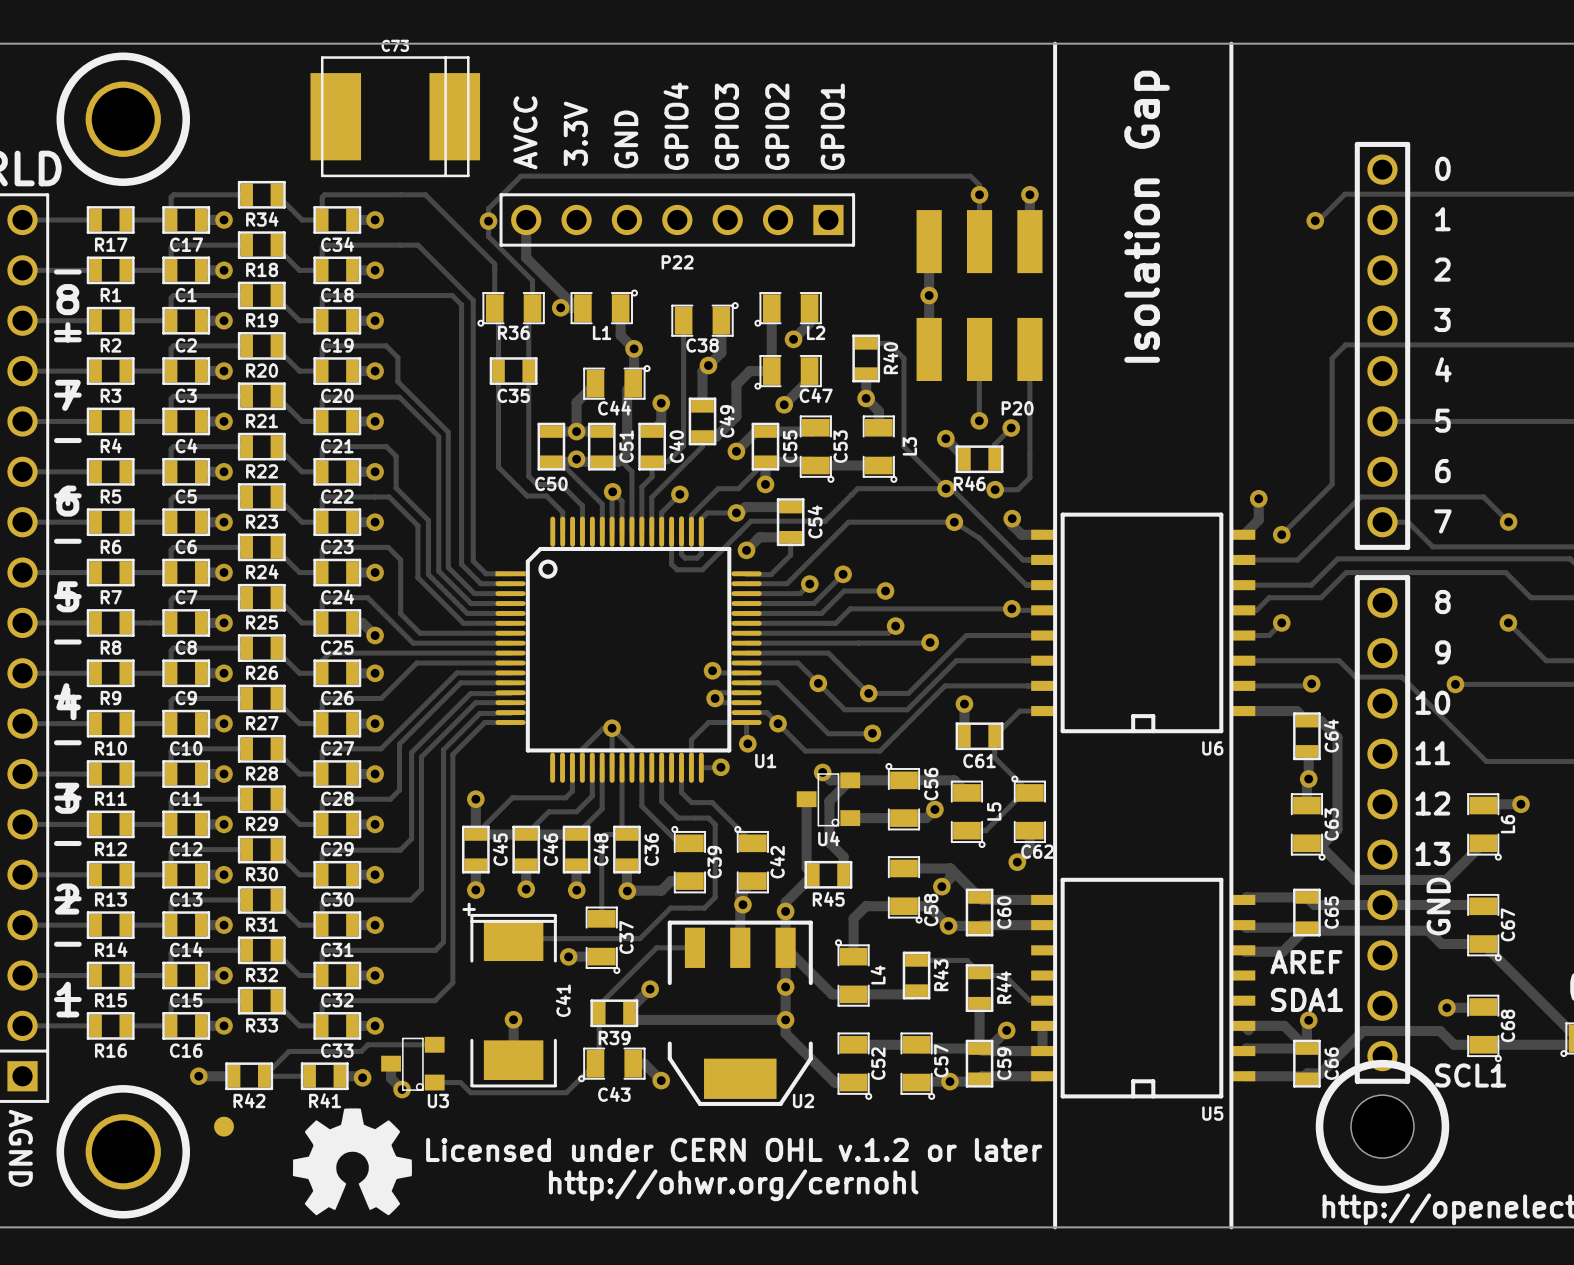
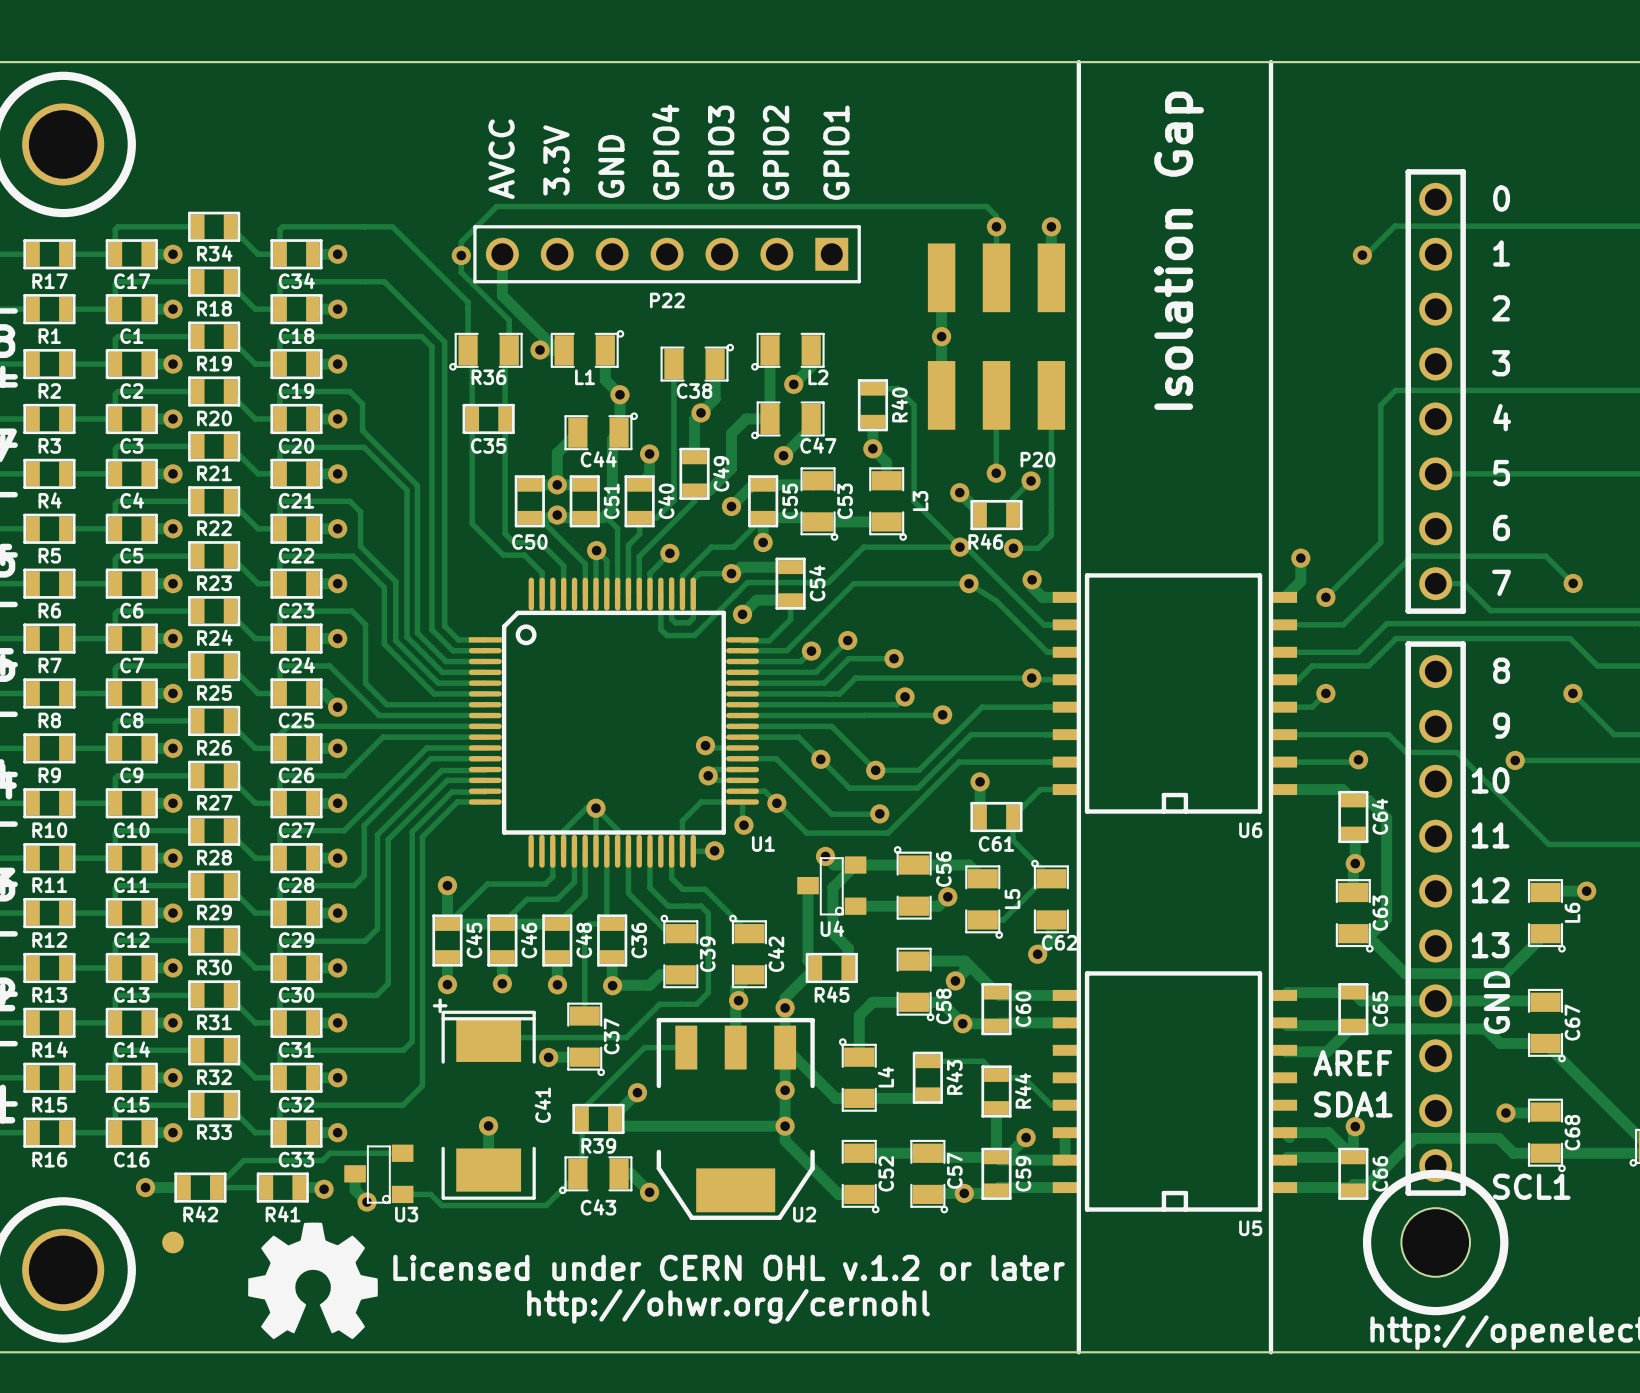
C73: (395, 116) -> none

